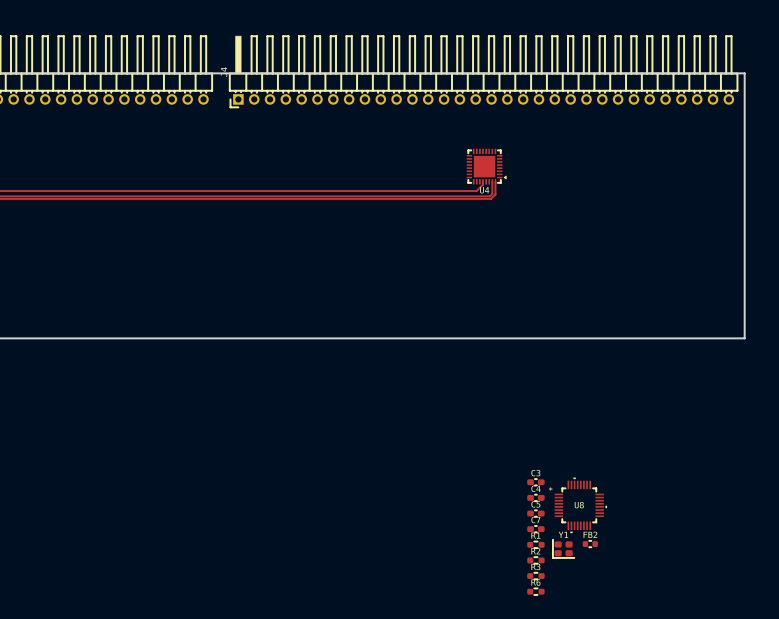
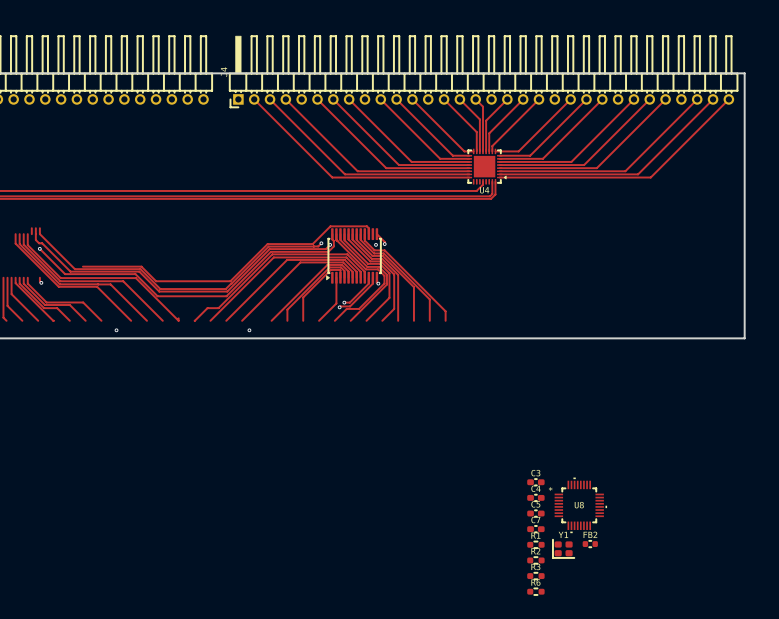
track: none -> (254, 99) (332, 177) (469, 177)
track: none -> (270, 99) (345, 174) (469, 174)
track: none -> (285, 99) (357, 171) (469, 171)
track: none -> (317, 99) (386, 168) (469, 168)
track: none -> (333, 99) (398, 165) (469, 165)
track: none -> (349, 99) (411, 161) (469, 161)
track: none -> (380, 99) (440, 158) (469, 158)
track: none -> (396, 99) (452, 155) (469, 155)
track: none -> (412, 99) (464, 151) (473, 151)
track: none -> (444, 99) (476, 132) (476, 151)
track: none -> (459, 99) (479, 119) (479, 151)
track: none -> (475, 99) (483, 106) (483, 151)
track: none -> (507, 99) (486, 120) (486, 151)
track: none -> (523, 99) (489, 133) (489, 151)
track: none -> (539, 99) (492, 146) (492, 151)
track: none -> (570, 99) (518, 151) (495, 151)
track: none -> (586, 99) (530, 155) (499, 155)
track: none -> (602, 99) (542, 158) (499, 158)
track: none -> (633, 99) (571, 161) (499, 161)
track: none -> (649, 99) (584, 165) (499, 165)
track: none -> (665, 99) (596, 168) (499, 168)
track: none -> (697, 99) (625, 171) (499, 171)
track: none -> (713, 99) (638, 174) (499, 174)
track: none -> (728, 99) (650, 177) (499, 177)
track: none -> (31, 228) (31, 234)
track: none -> (35, 228) (35, 240) (42, 243) (70, 271) (139, 271) (159, 291) (227, 291) (269, 249) (325, 249) (330, 244)
track: none -> (39, 228) (39, 234) (74, 269) (140, 269) (160, 289) (225, 289) (268, 246) (318, 246) (321, 243)
track: none -> (15, 234) (15, 243) (58, 286) (97, 286) (131, 320)
track: none -> (19, 234) (19, 244) (59, 284) (110, 284) (146, 320)
track: none -> (23, 234) (23, 244) (60, 281) (123, 281) (162, 320)
track: none -> (27, 234) (27, 245) (60, 278) (135, 278) (178, 320) (178, 318)
track: none -> (332, 234) (333, 246) (328, 251) (270, 251) (226, 296) (157, 296) (135, 274) (65, 274) (39, 248)
track: none -> (336, 234) (336, 240) (365, 269) (378, 269) (384, 275) (384, 283) (359, 308) (346, 308) (334, 320)
track: none -> (340, 234) (340, 240) (367, 266) (379, 266) (386, 274) (386, 284) (350, 320)
track: none -> (344, 234) (344, 240) (368, 263) (379, 263) (389, 273) (389, 297) (366, 320)
track: none -> (348, 234) (348, 239) (370, 261) (381, 261)
track: none -> (352, 234) (352, 239) (371, 258) (382, 258)
track: none -> (356, 234) (356, 240) (372, 255) (382, 255) (413, 287) (413, 320)
track: none -> (360, 234) (360, 240) (374, 253) (383, 253) (429, 299) (429, 320)
track: none -> (364, 234) (364, 240) (374, 250) (384, 250) (445, 311) (445, 320)
track: none -> (368, 234) (366, 226) (330, 226) (312, 244) (267, 244) (230, 281) (156, 281) (141, 266) (82, 266)
track: none -> (376, 234) (384, 244)
via: none -> (321, 243)
via: none -> (330, 244)
via: none -> (376, 244)
via: none -> (384, 244)
via: none -> (39, 248)
part: none -> (353, 255)
track: none -> (382, 258) (398, 274) (398, 320)
track: none -> (381, 261) (394, 274) (394, 308) (382, 320)
track: none -> (3, 277) (3, 317) (6, 320)
track: none -> (7, 277) (7, 305) (22, 320)
track: none -> (11, 277) (11, 294) (38, 320)
track: none -> (15, 277) (15, 283) (54, 320)
track: none -> (19, 277) (19, 283) (44, 308) (57, 308) (69, 320)
track: none -> (23, 277) (23, 283) (45, 304) (69, 304) (85, 320)
track: none -> (27, 277) (27, 283) (46, 302) (83, 302) (101, 320)
track: none -> (39, 277) (41, 282)
track: none -> (336, 277) (336, 303) (319, 320)
track: none -> (340, 277) (339, 269) (330, 269) (303, 297) (303, 320)
track: none -> (344, 277) (344, 270) (340, 267) (329, 267) (287, 309) (287, 320)
track: none -> (348, 277) (348, 271) (342, 264) (327, 264) (271, 320)
track: none -> (352, 277) (352, 271) (343, 262) (300, 262) (242, 320)
track: none -> (356, 277) (356, 271) (344, 259) (287, 259) (226, 320)
track: none -> (360, 277) (360, 271) (346, 257) (273, 257) (210, 320)
track: none -> (364, 277) (364, 271) (347, 254) (272, 254) (218, 308) (207, 308) (194, 320)
track: none -> (368, 277) (368, 283) (349, 302) (344, 302)
track: none -> (372, 277) (372, 283) (350, 306) (339, 307)
via: none -> (41, 282)
via: none -> (378, 283)
via: none -> (344, 302)
via: none -> (339, 307)
via: none -> (116, 330)
via: none -> (249, 330)

